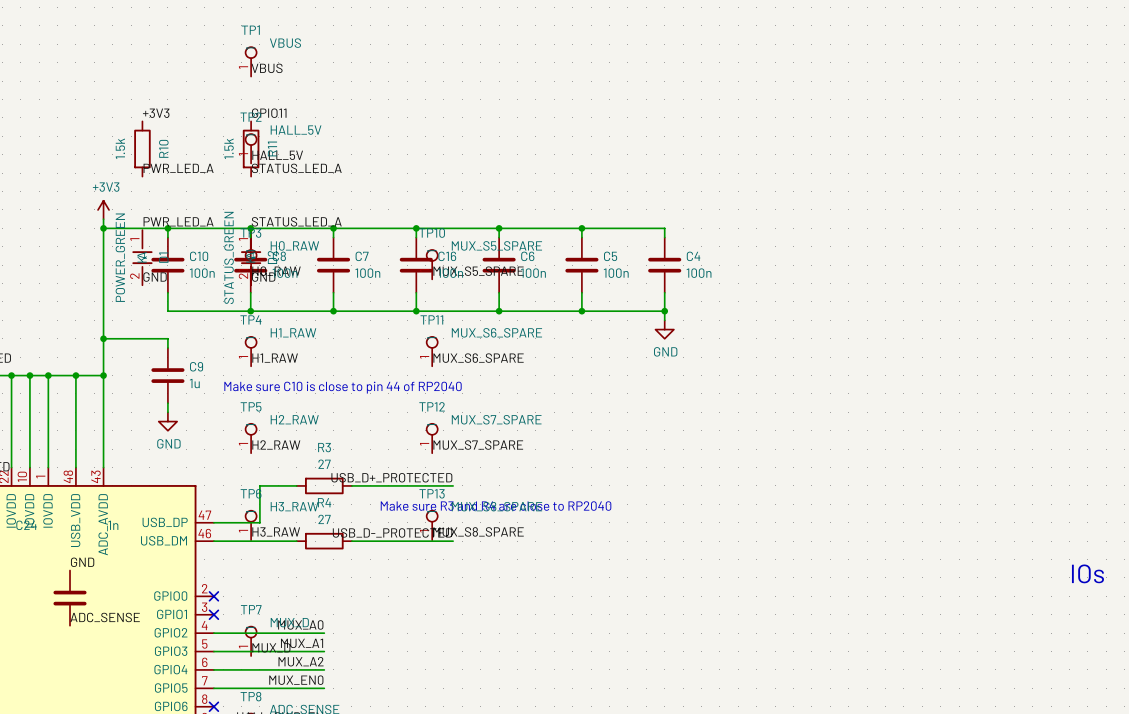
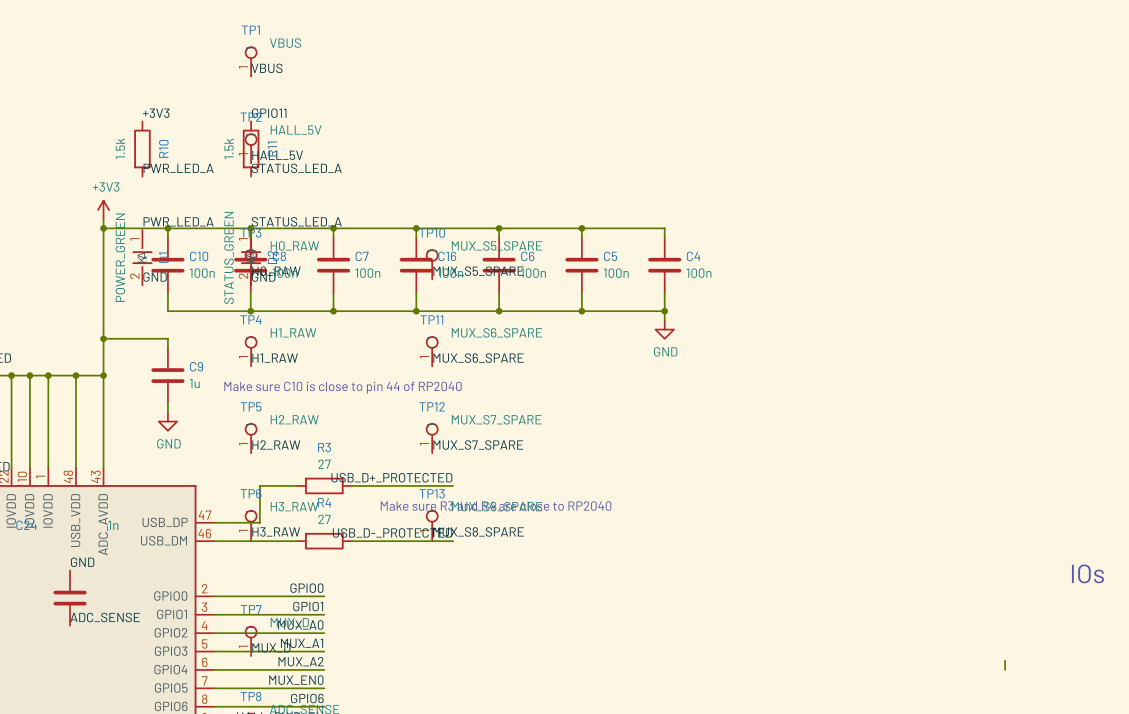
label: none -> GPIO0 (306, 588)
wire: none -> (213, 596) (324, 596)
no-connect mark: (213, 596) -> none
label: none -> GPIO1 (308, 606)
wire: none -> (213, 614) (324, 614)
no-connect mark: (213, 614) -> none
wire: none -> (1005, 660) (1005, 669)
label: none -> GPIO6 (307, 698)
wire: none -> (213, 706) (324, 706)
no-connect mark: (213, 706) -> none

